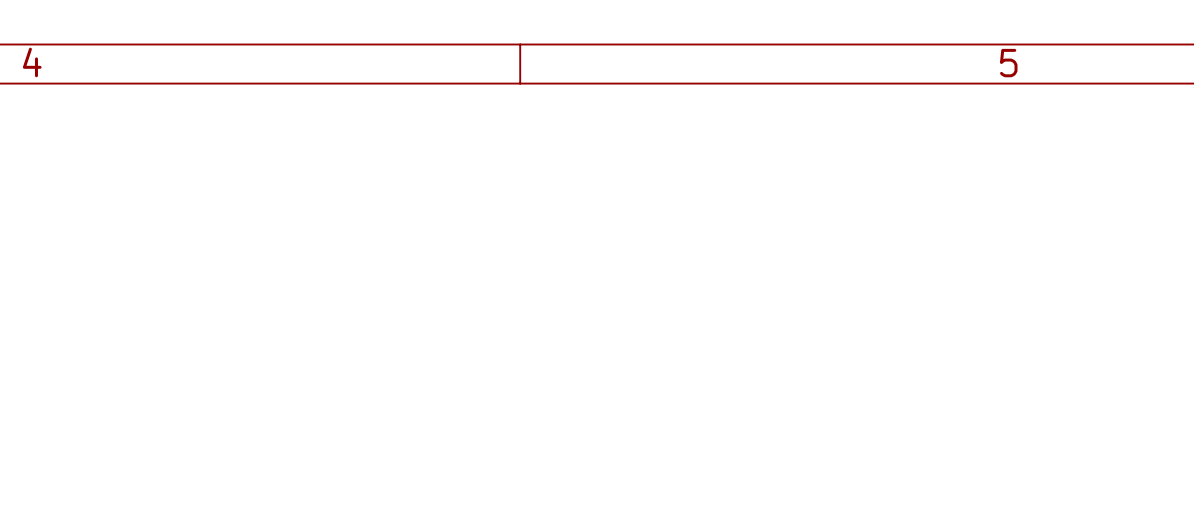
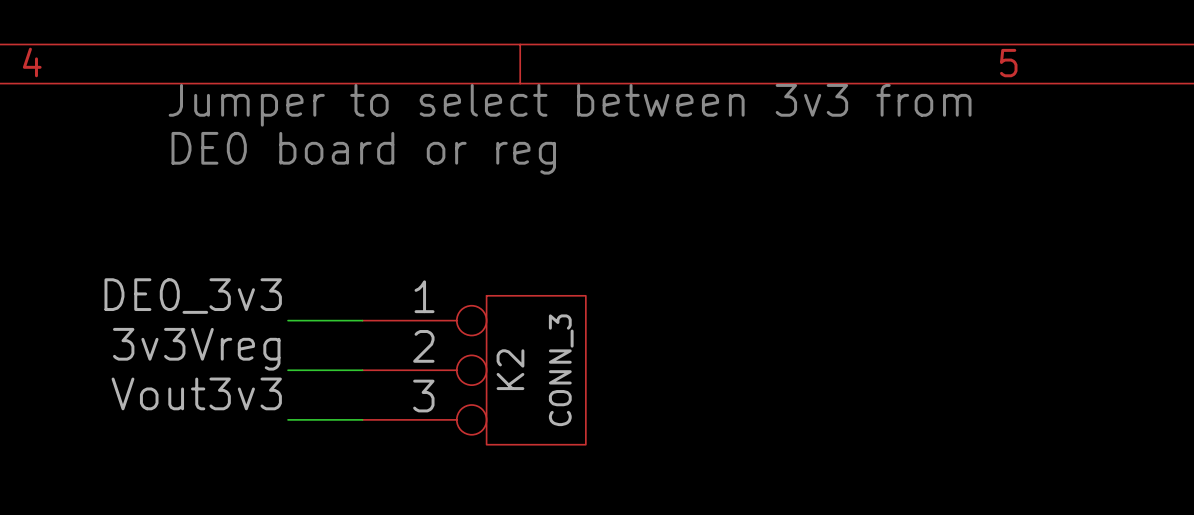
text: none -> Jumper to select between 3v3 from (570, 105)
text: none -> DE0 board or reg (363, 153)
label: none -> DE0_3v3 (193, 296)
wire: none -> (288, 320) (362, 320)
label: none -> 3v3Vreg (196, 349)
wire: none -> (288, 370) (362, 370)
K2: none -> CONN_3 (474, 370)
label: none -> Vout3v3 (196, 393)
wire: none -> (288, 419) (362, 419)

